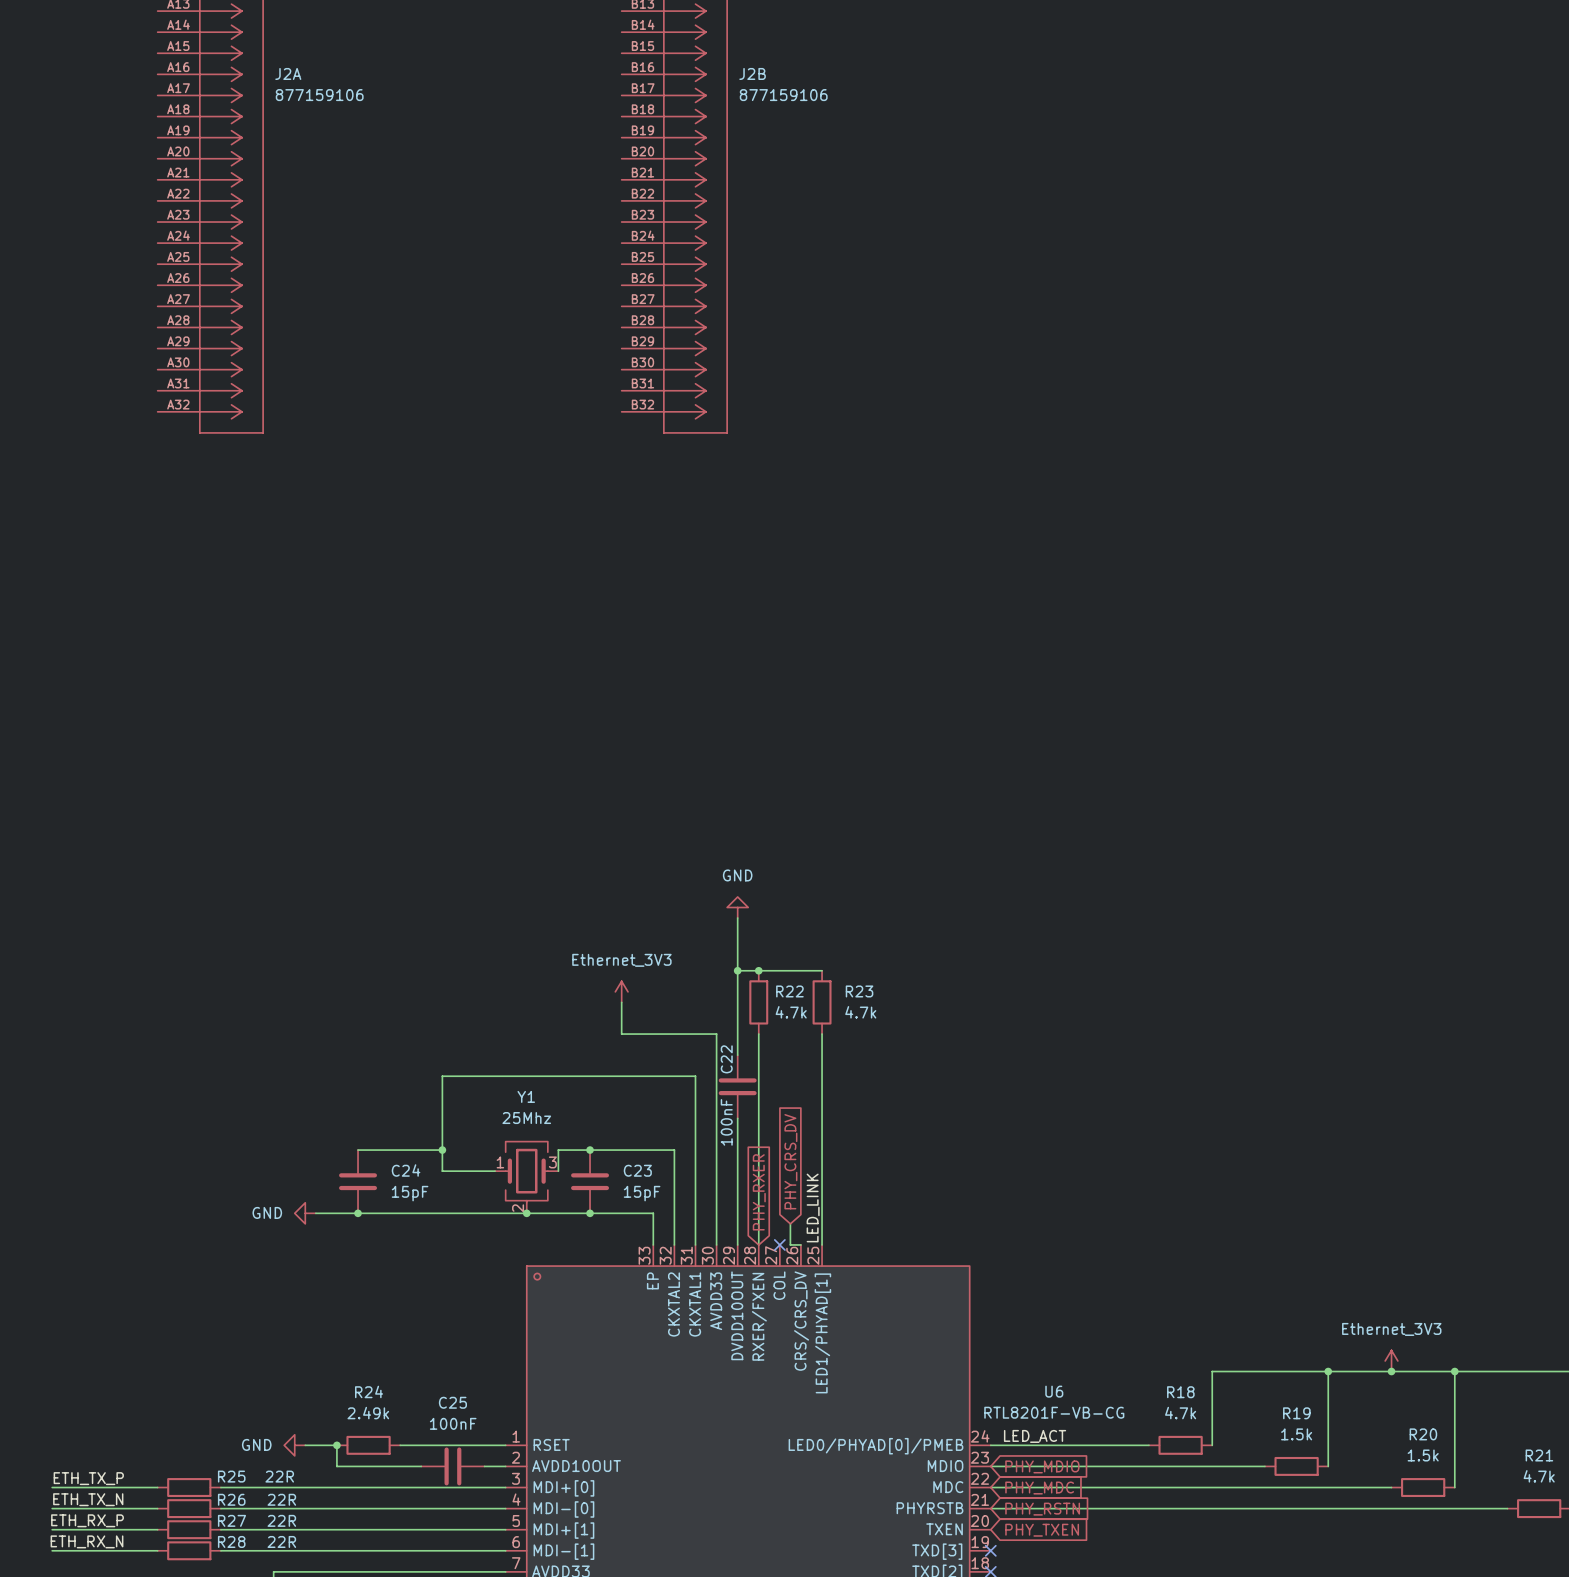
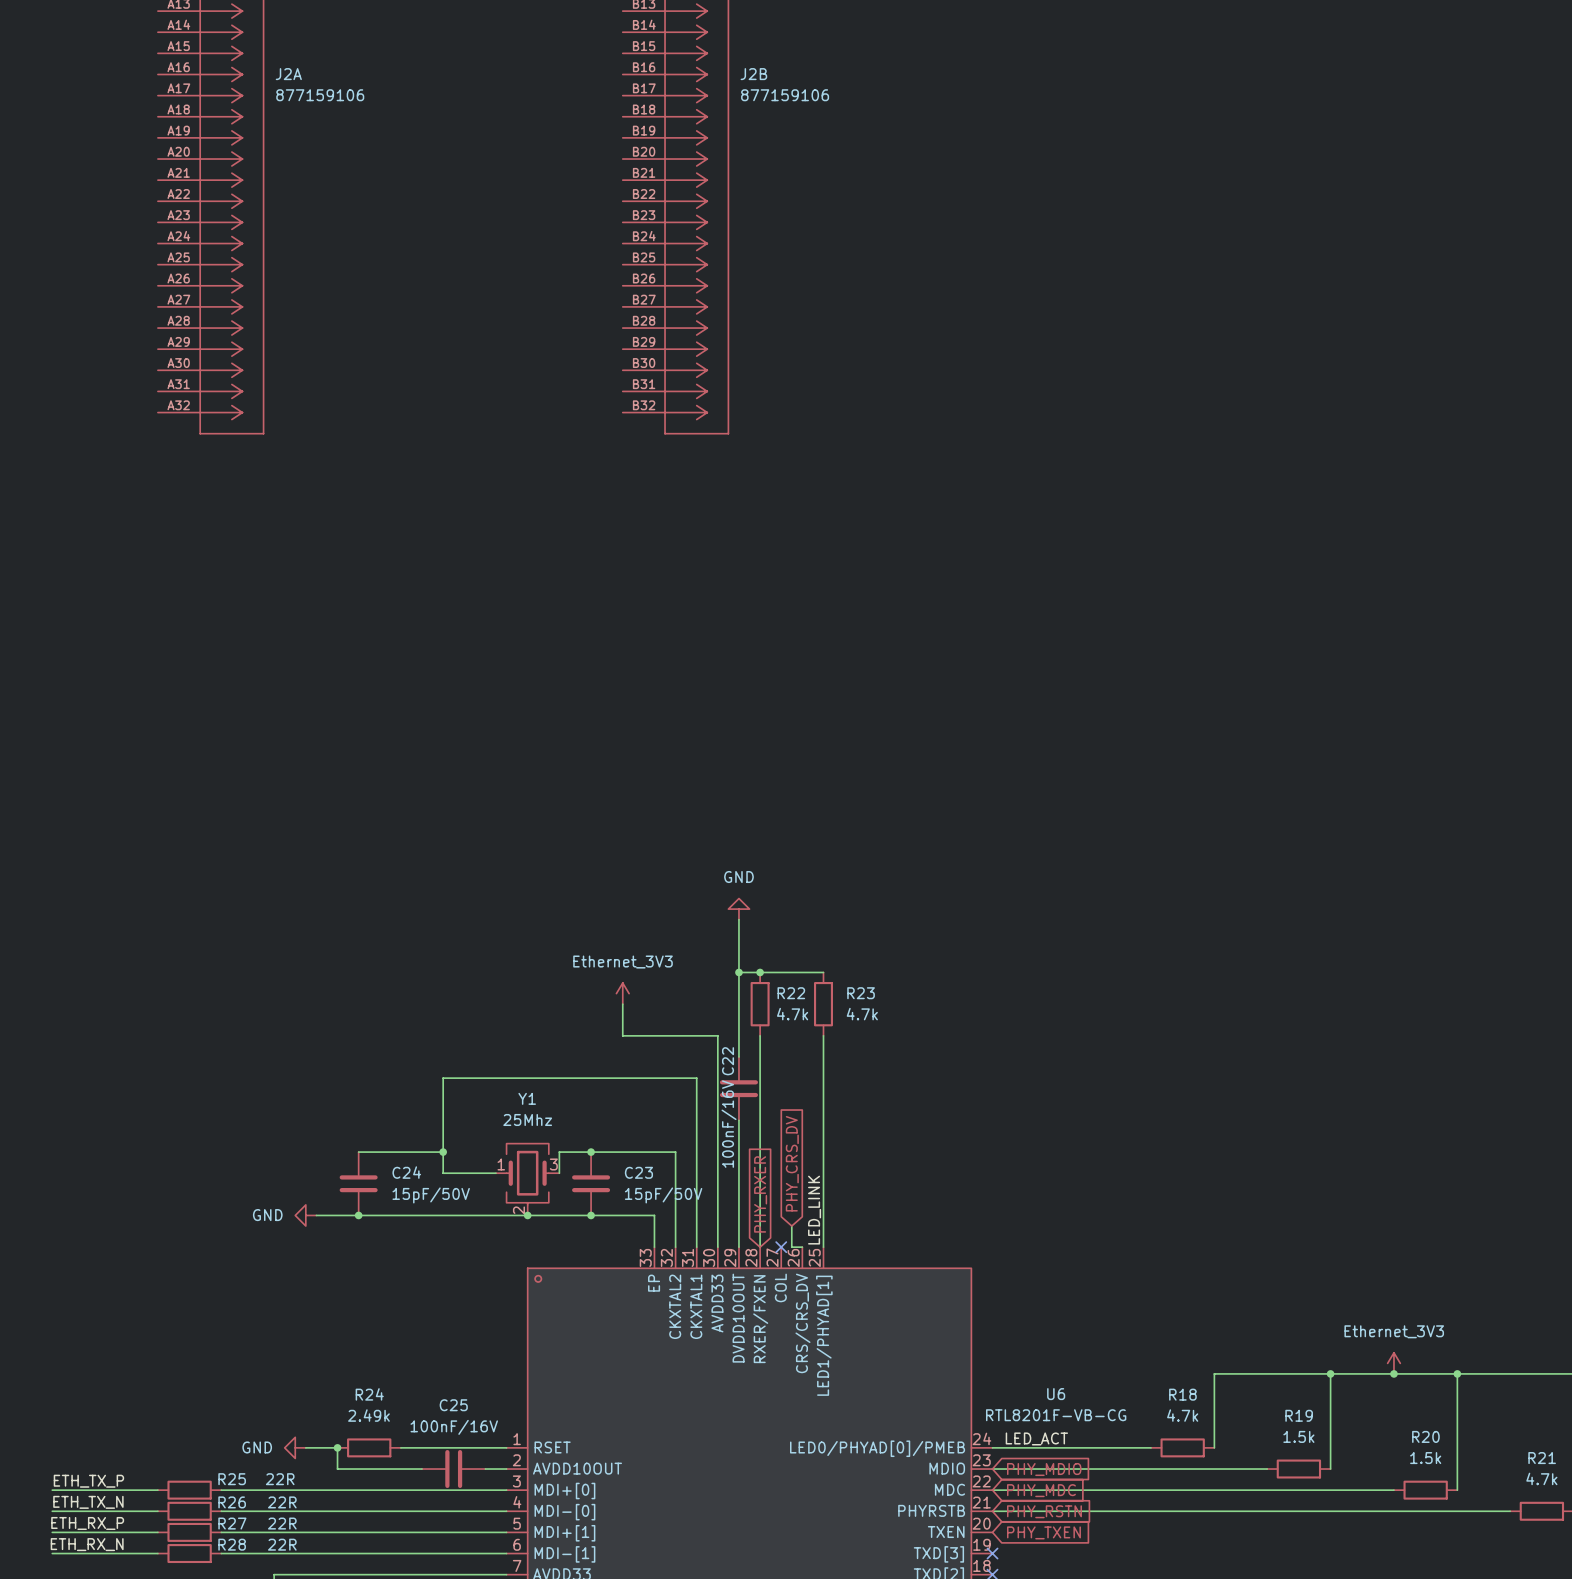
C22 value: 100nF (726, 1122) -> 100nF/16V (729, 1124)
C24 value: 15pF (410, 1193) -> 15pF/50V (431, 1195)
C23 value: 15pF (642, 1193) -> 15pF/50V (663, 1195)
C25 value: 100nF (453, 1423) -> 100nF/16V (454, 1427)

